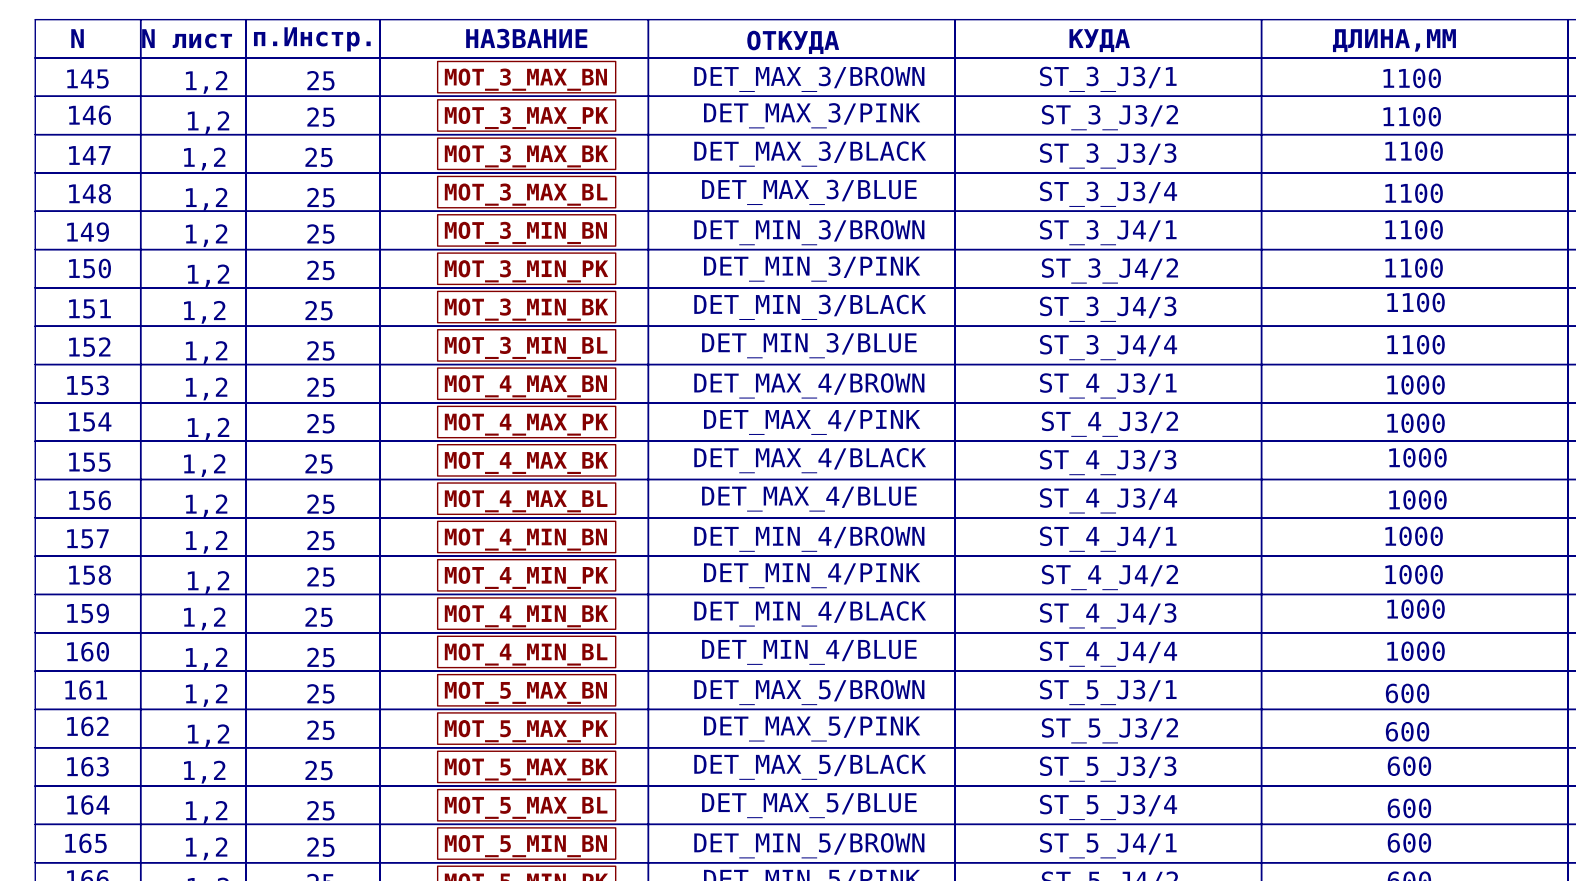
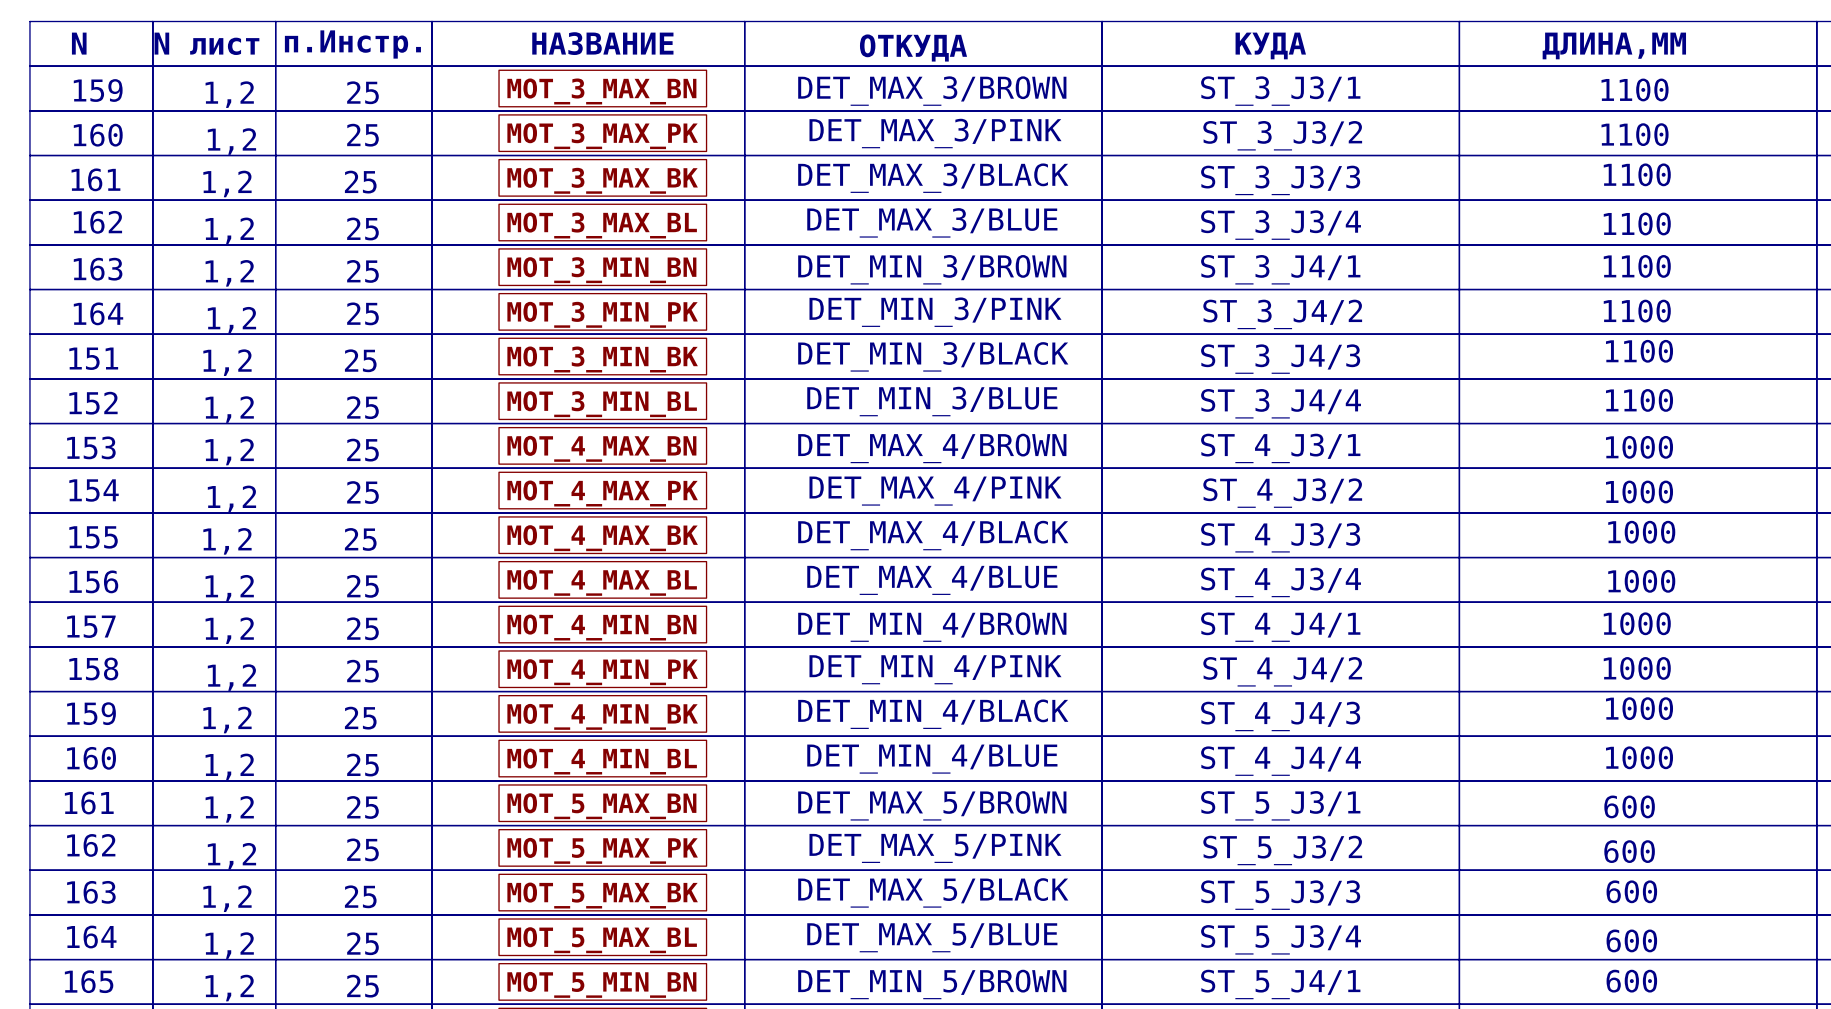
text: 145 (87, 79) -> 159 (98, 90)
text: 146 (90, 115) -> 160 (98, 135)
text: 147 (89, 155) -> 161 (95, 179)
text: 148 (90, 193) -> 162 (97, 222)
text: 149 (88, 232) -> 163 (98, 269)
text: 150 (90, 268) -> 164 (98, 313)

